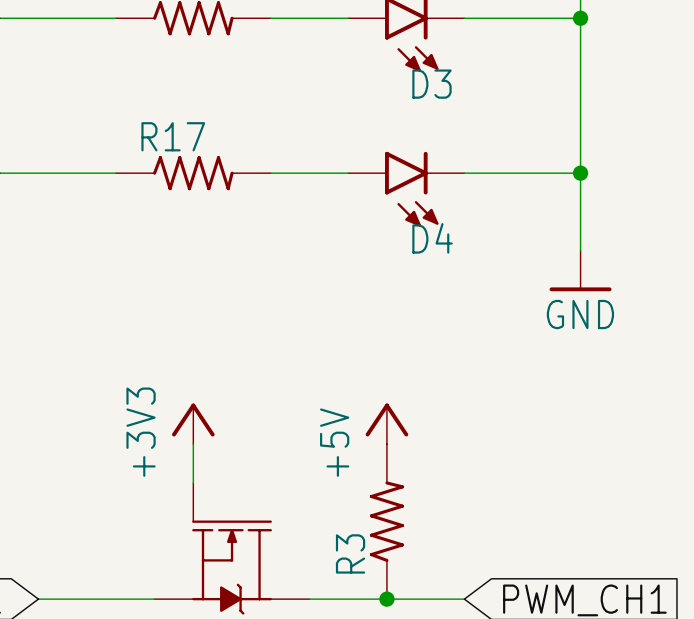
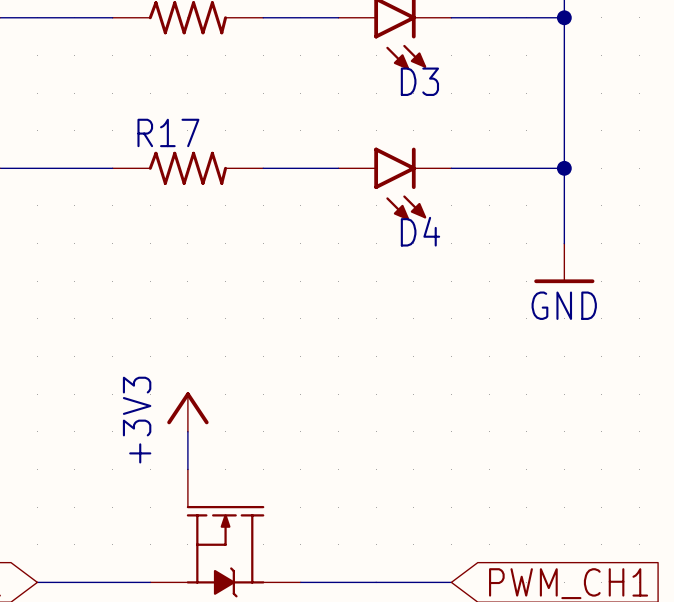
power symbol: +5V (386, 423) -> none
R3: (386, 521) -> none
junction: (386, 599) -> none

